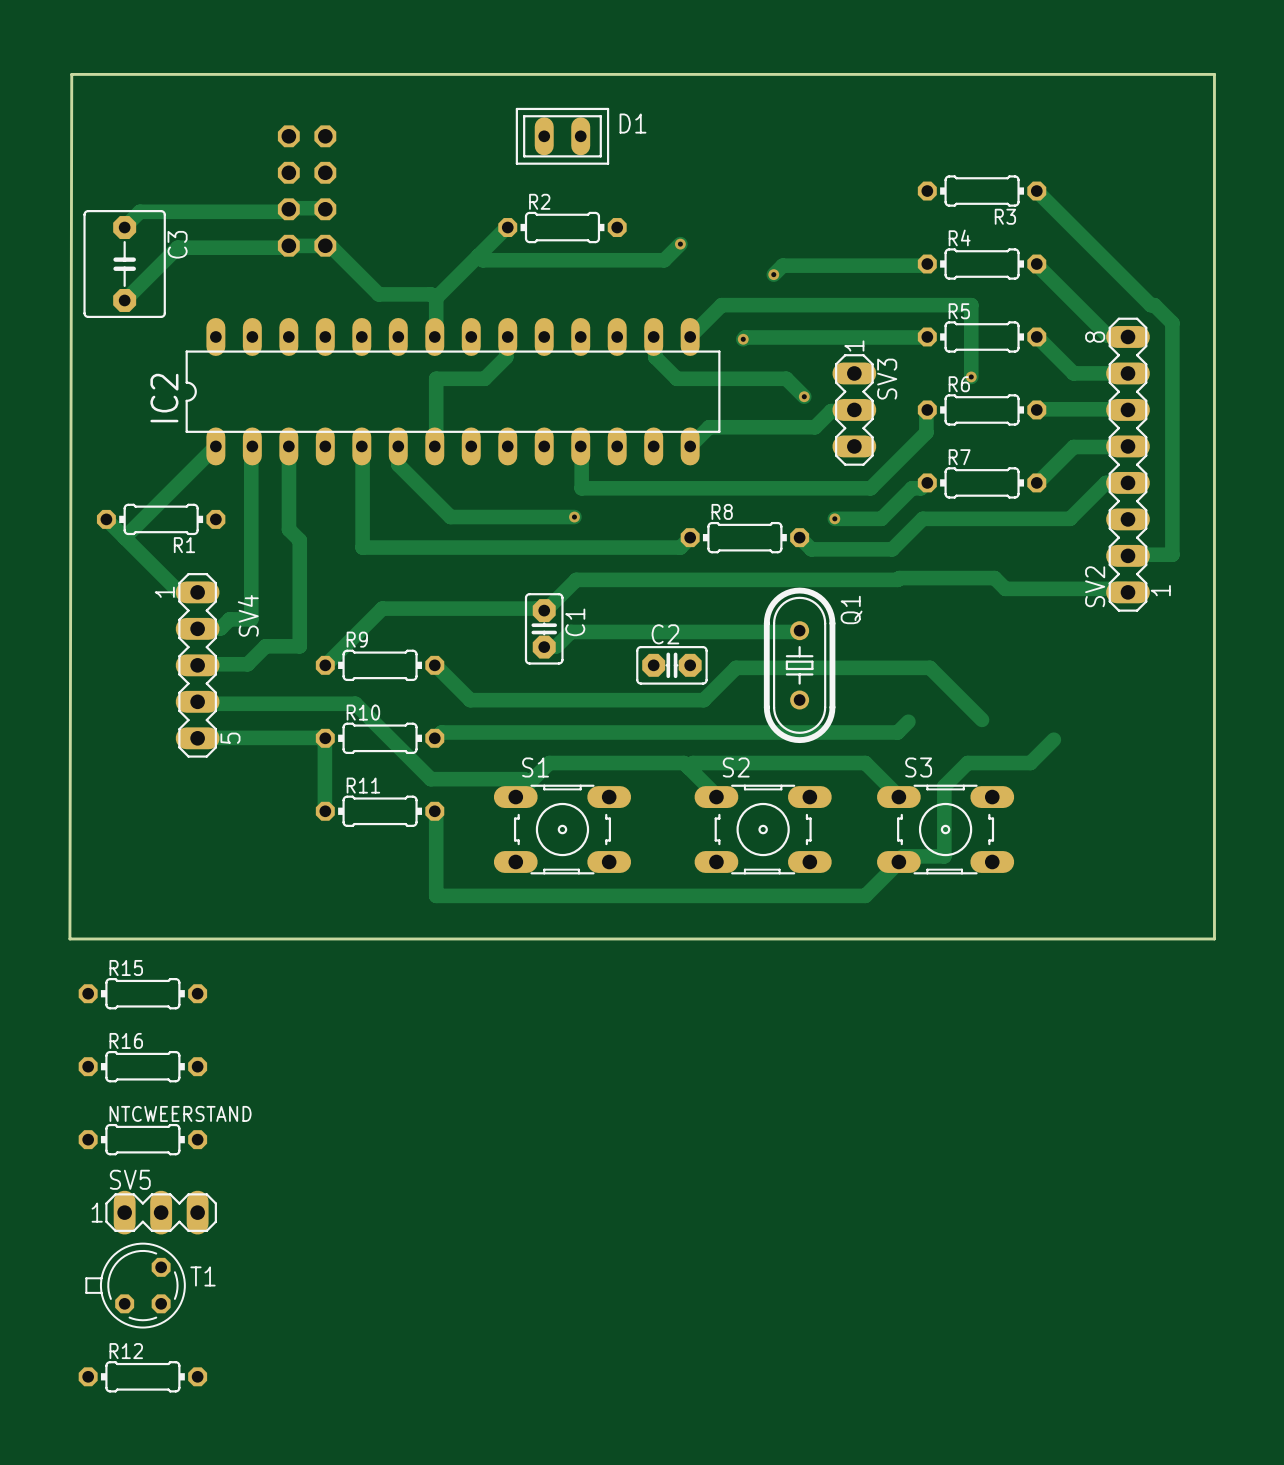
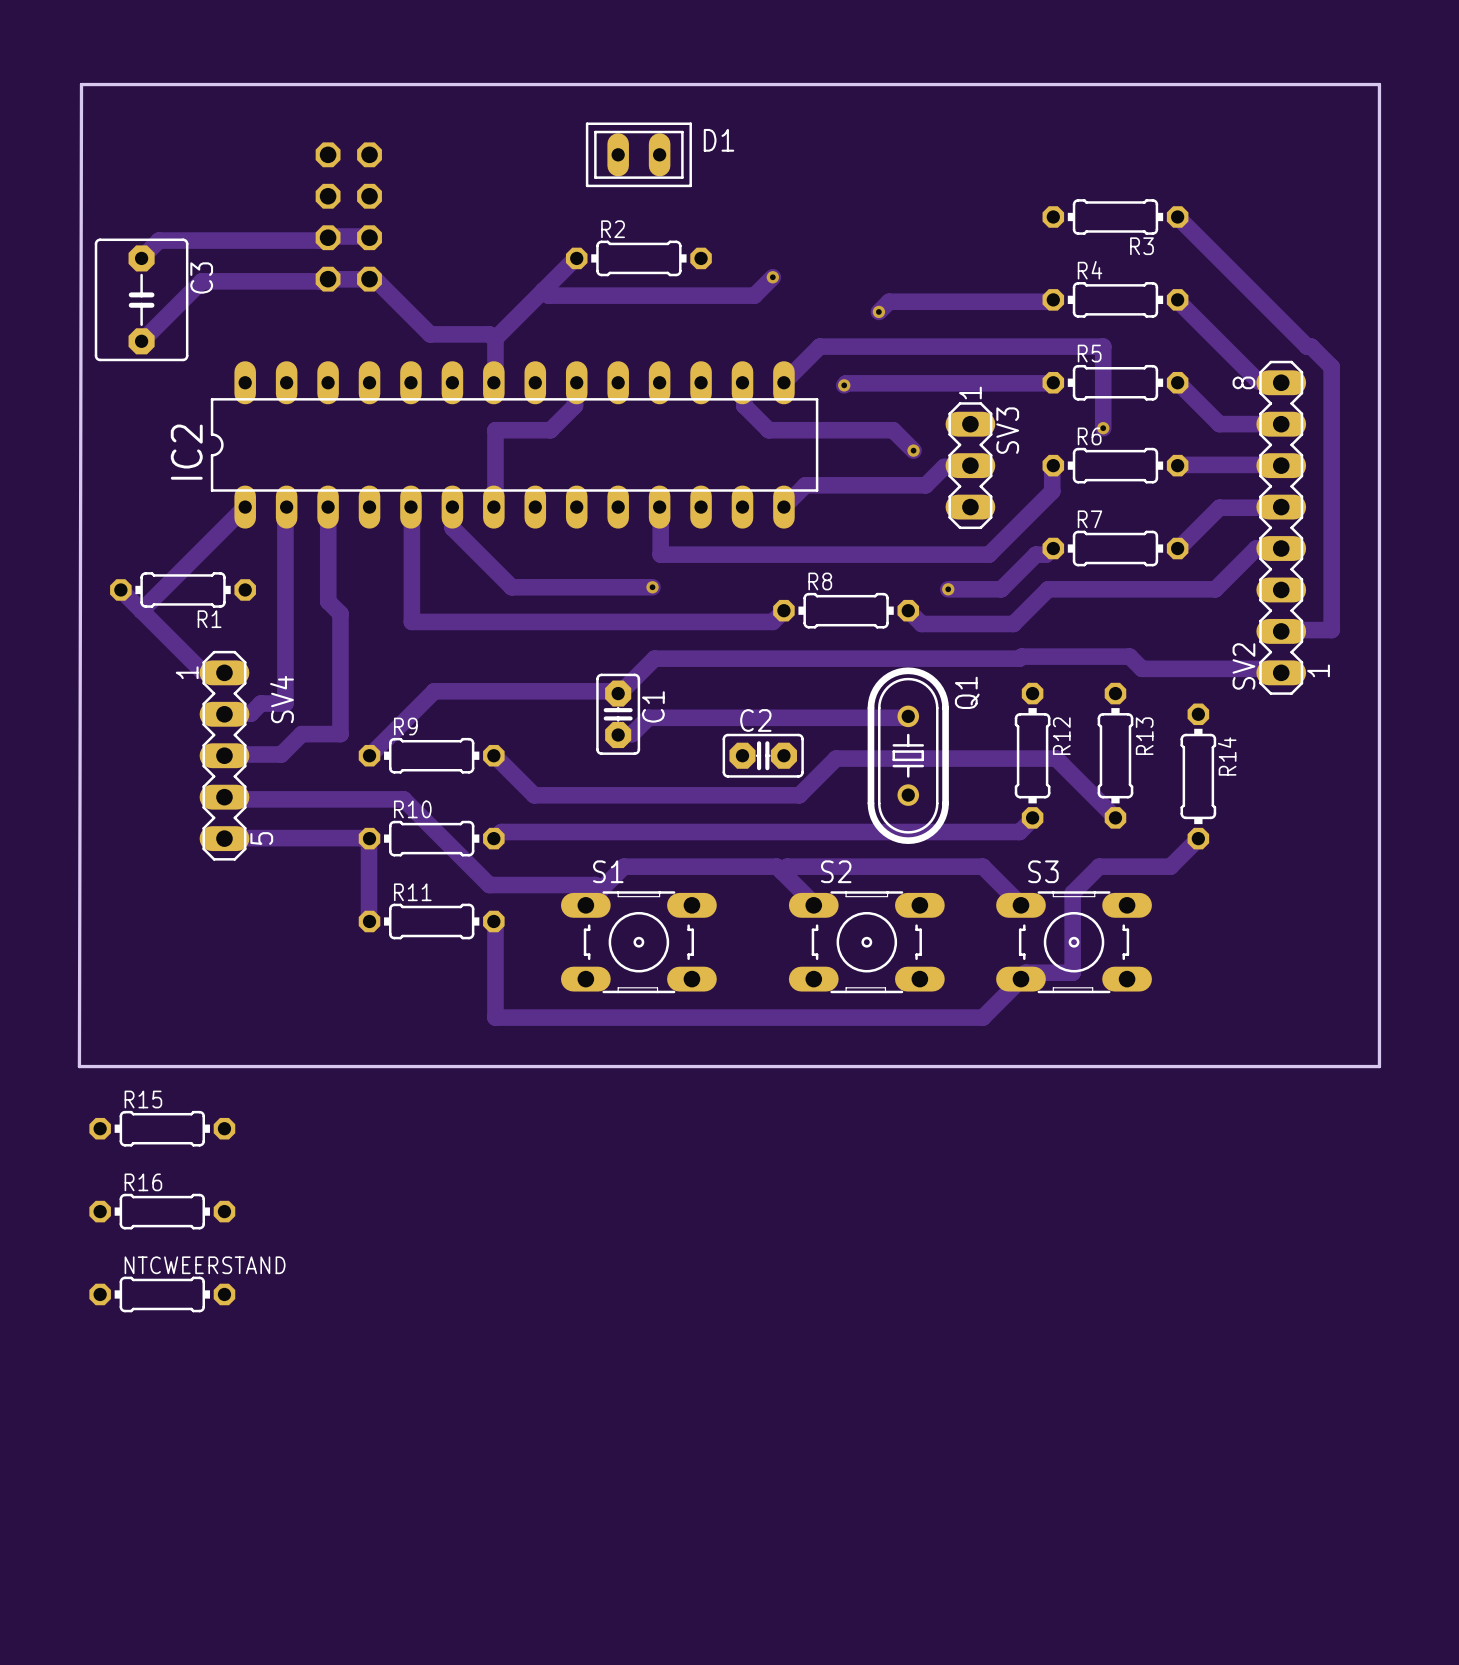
R13: none -> (1115, 755)
R14: none -> (1198, 776)
SV5: (161, 1212) -> none
T1: (135, 1285) -> none
R12 rotation: 0° (142, 1376) -> 90° clockwise (1032, 755)
R12 position: (142, 1376) -> (1032, 755)

